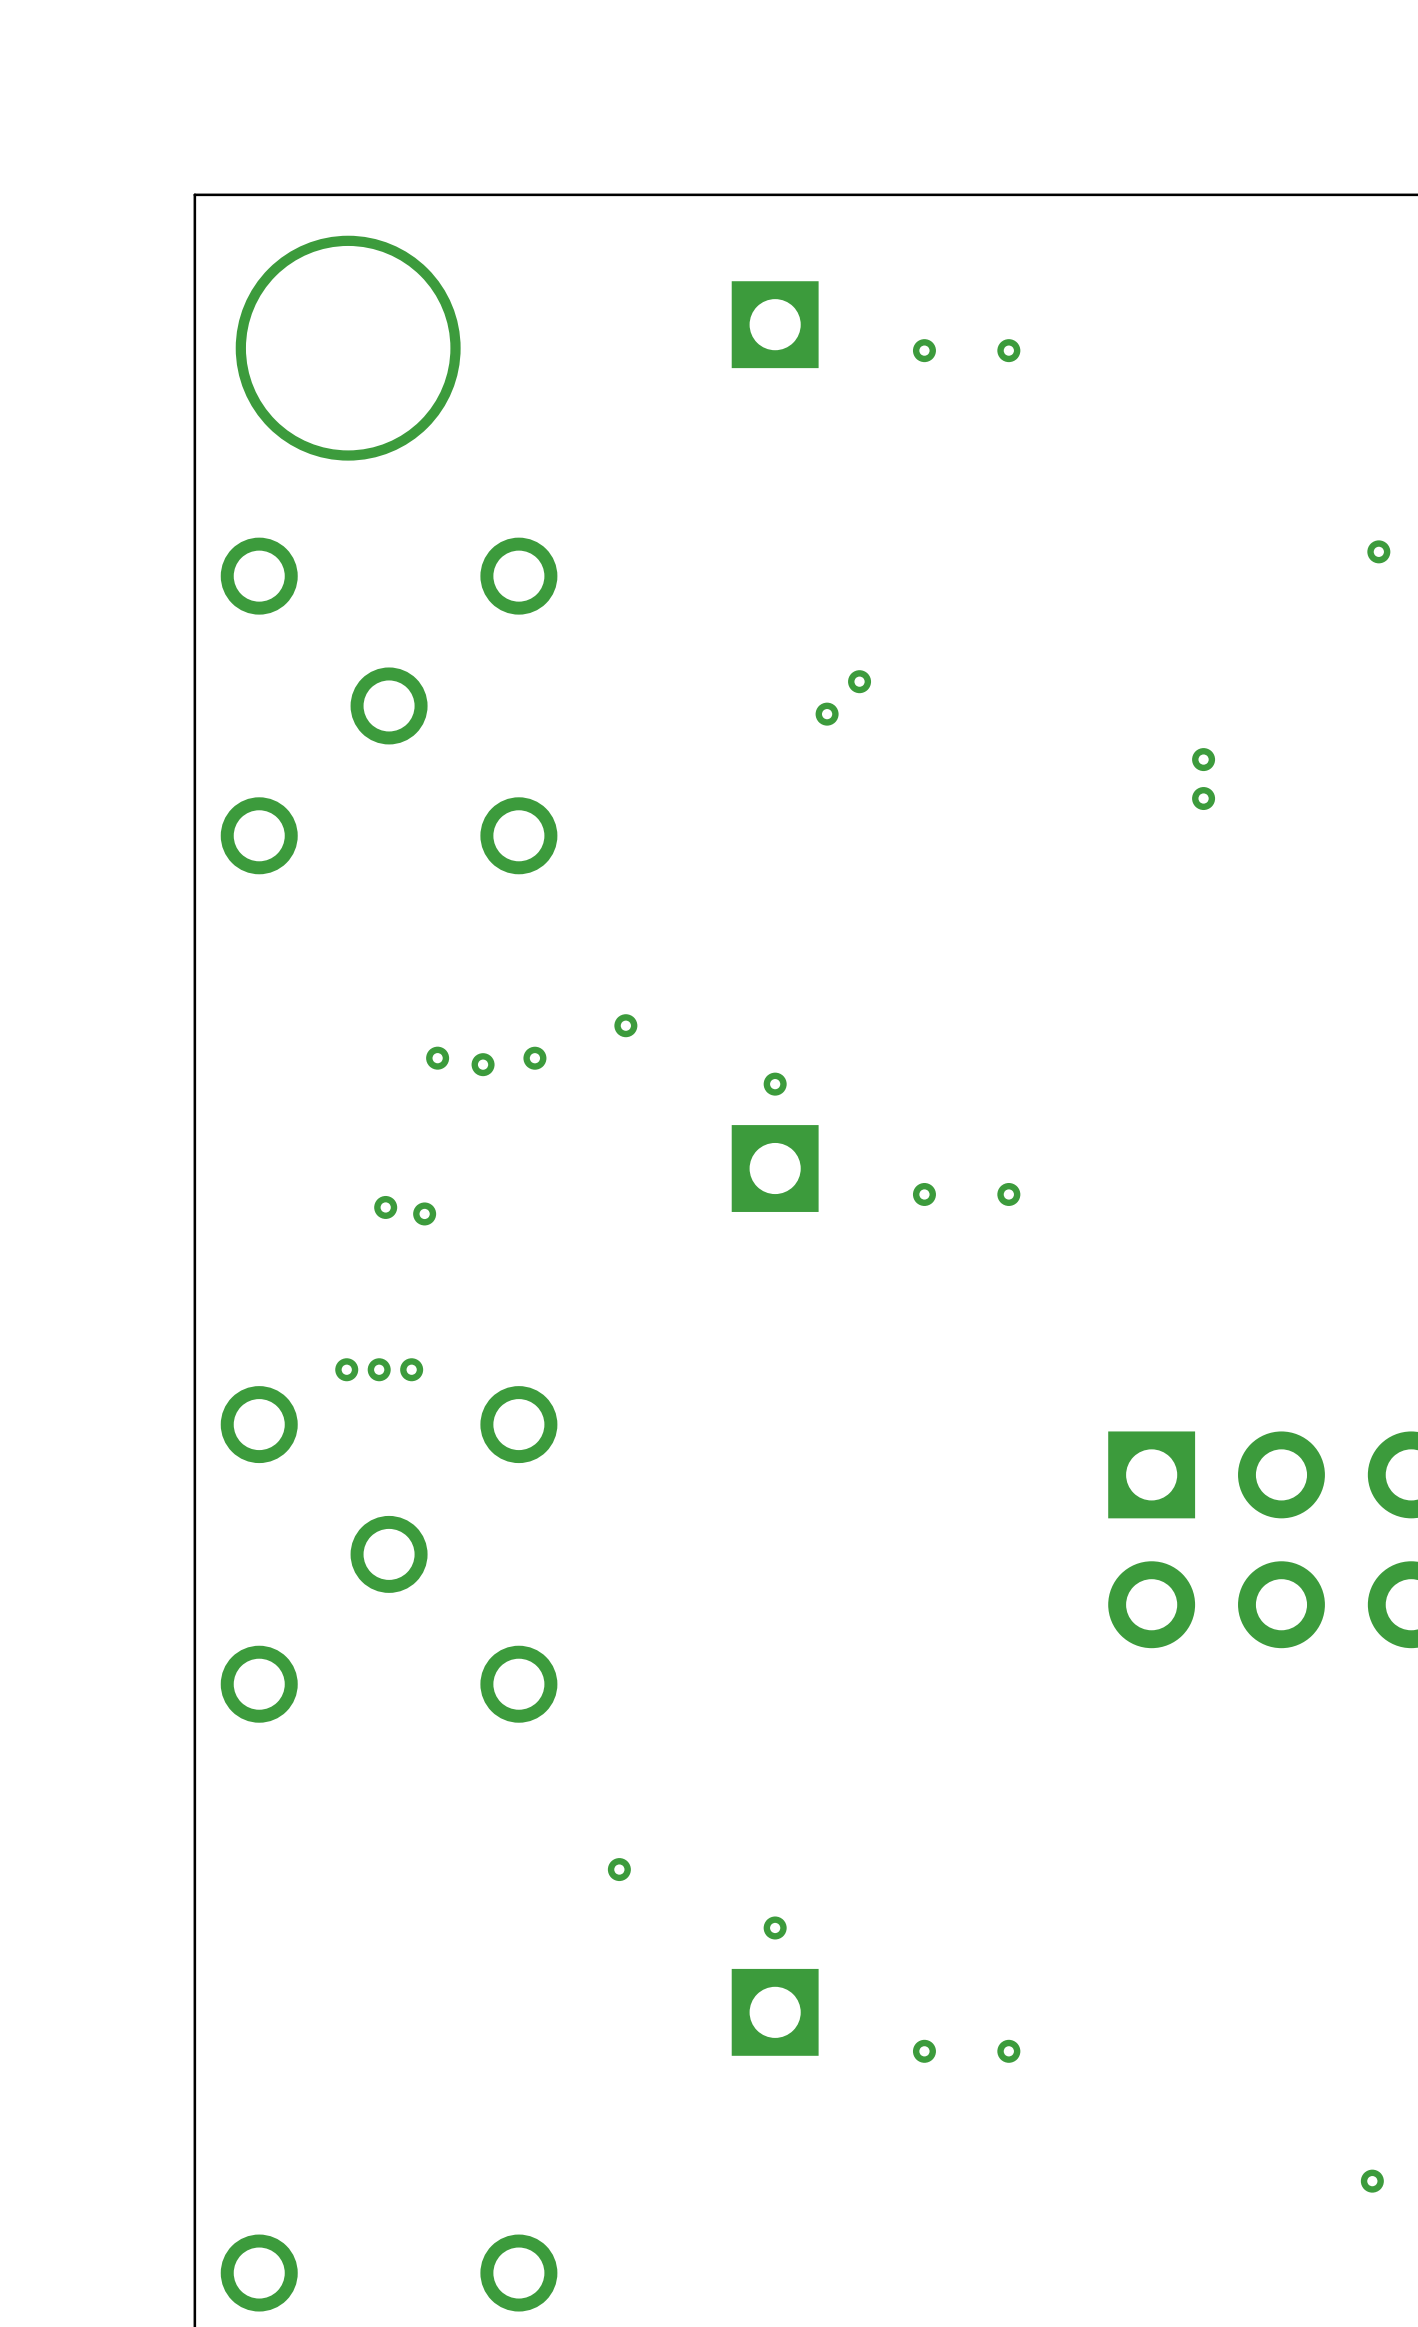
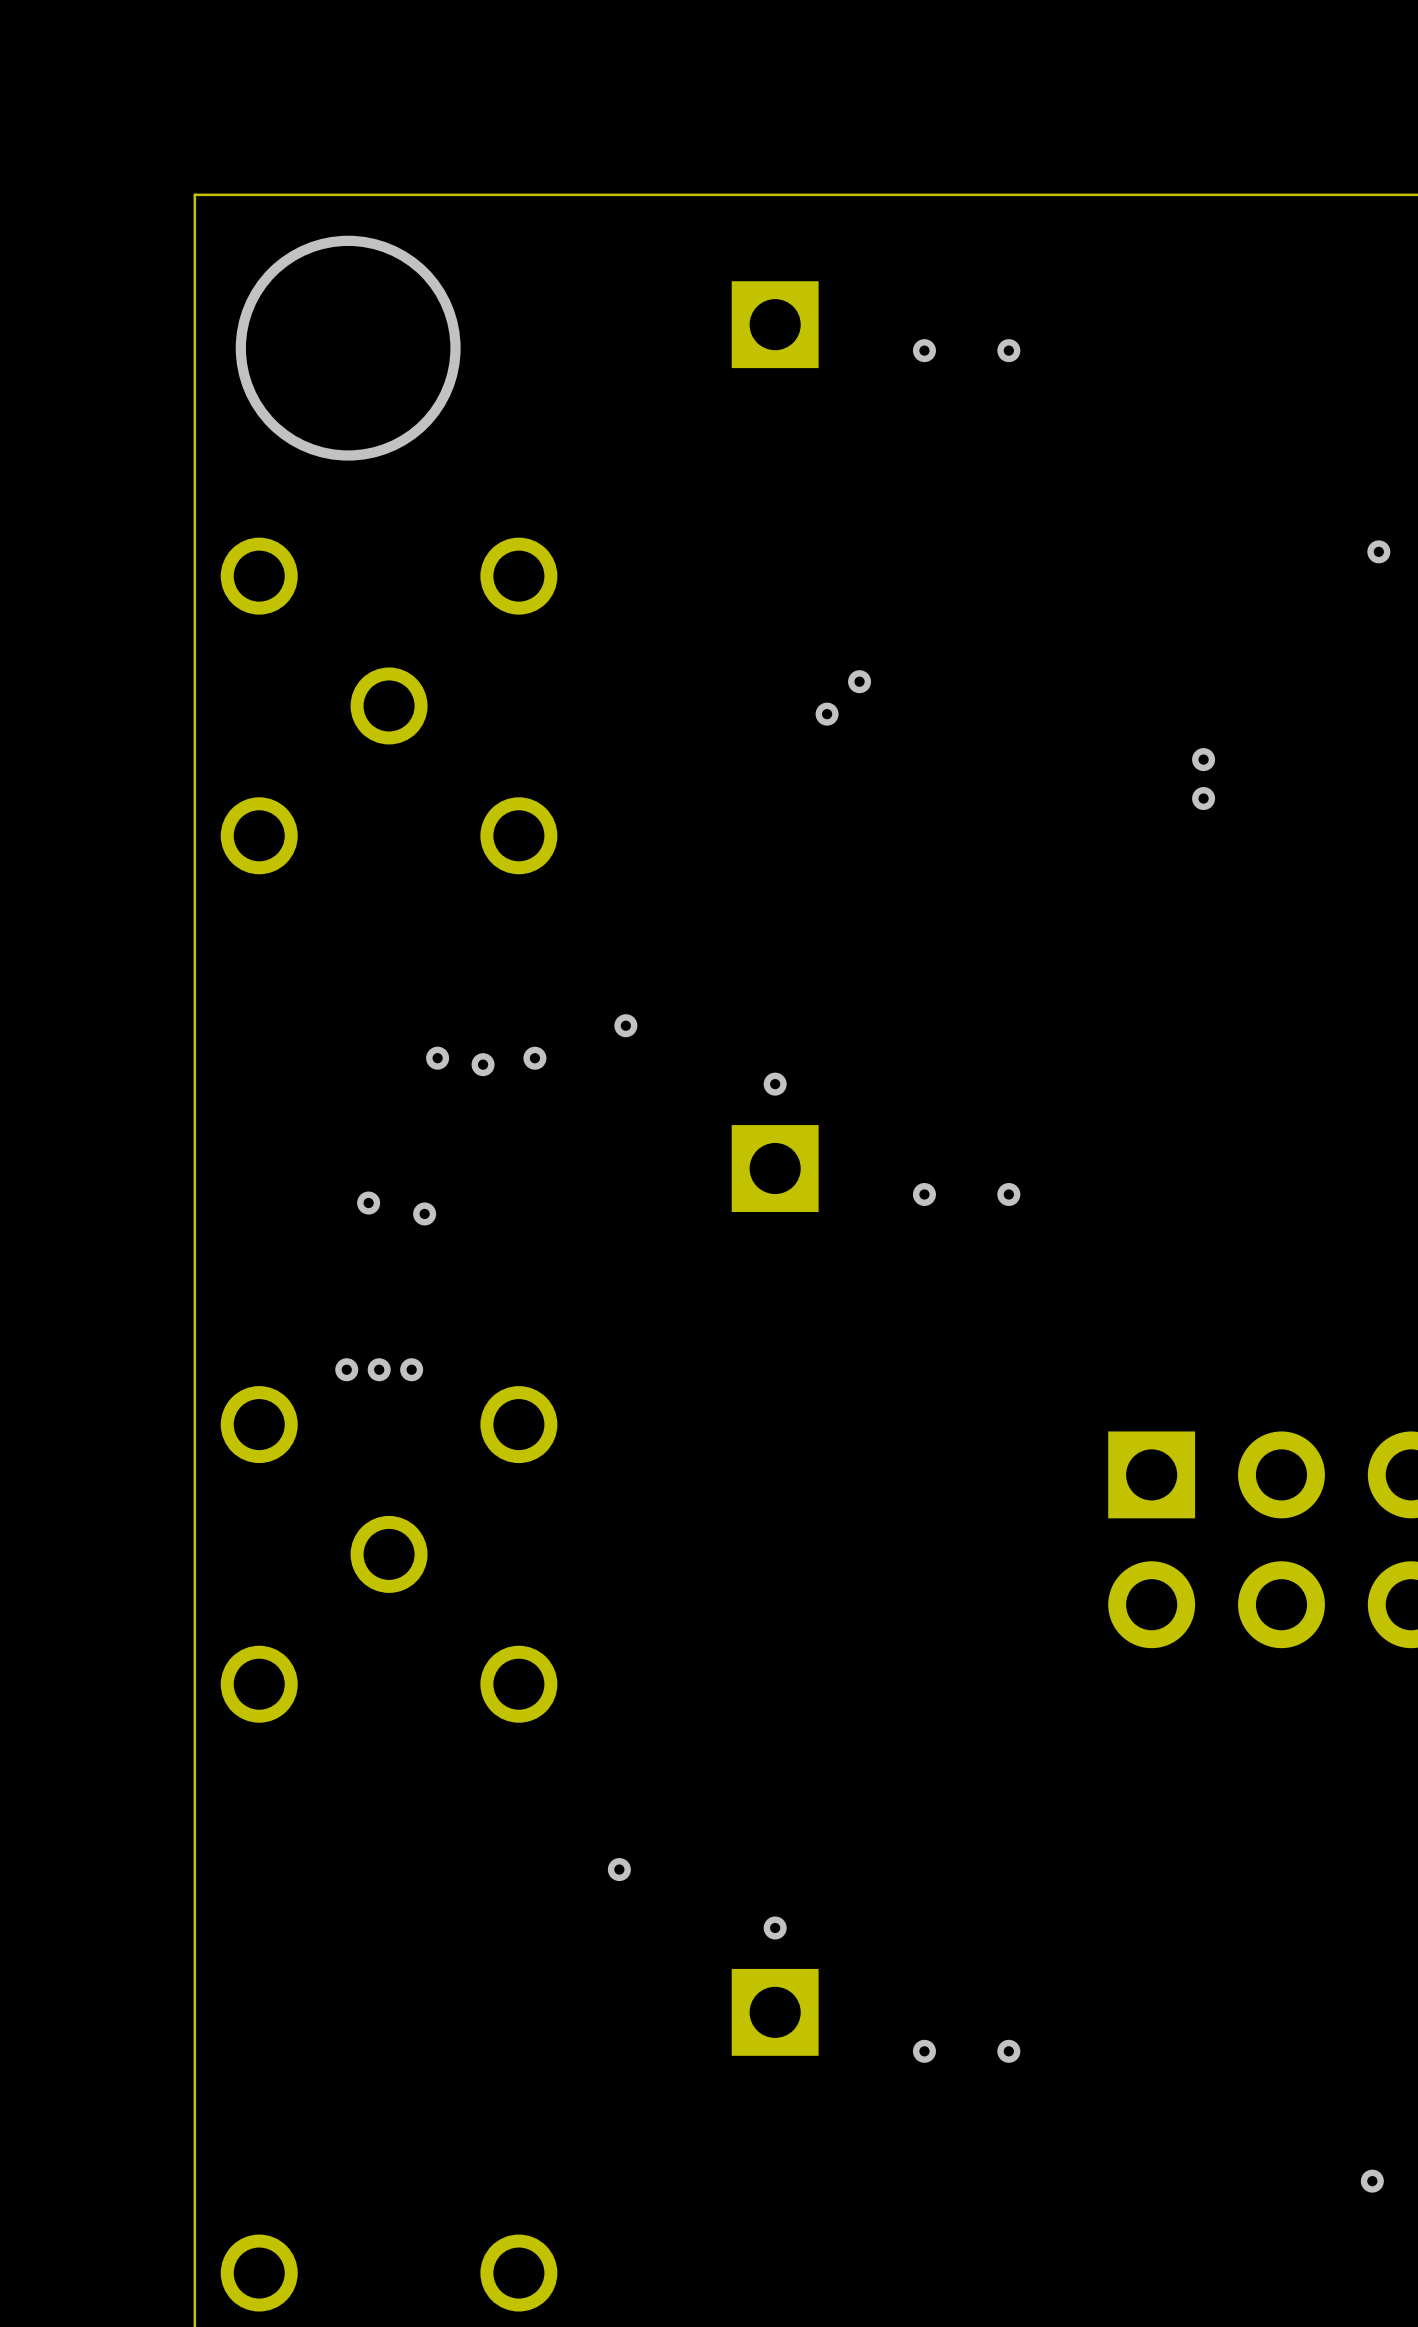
via position: (385, 1207) -> (368, 1203)

